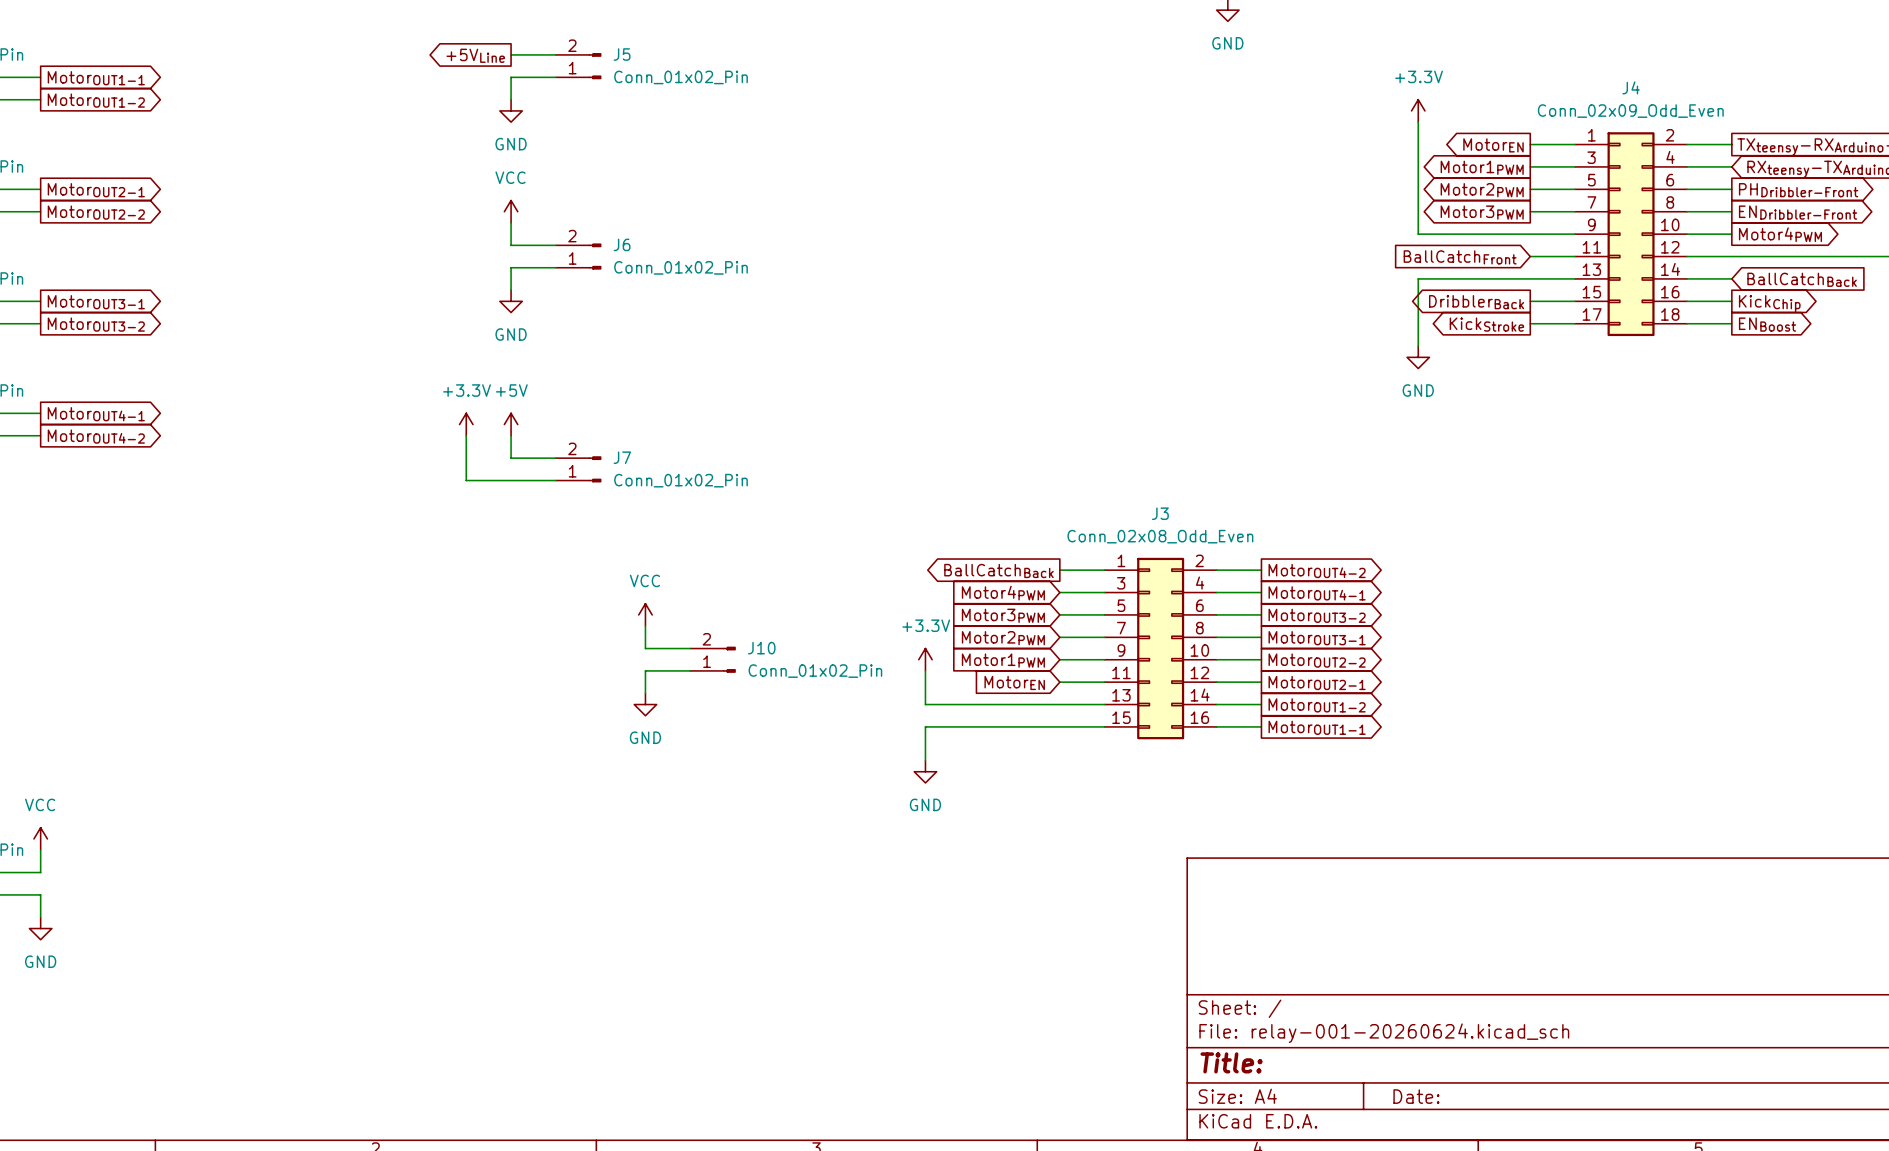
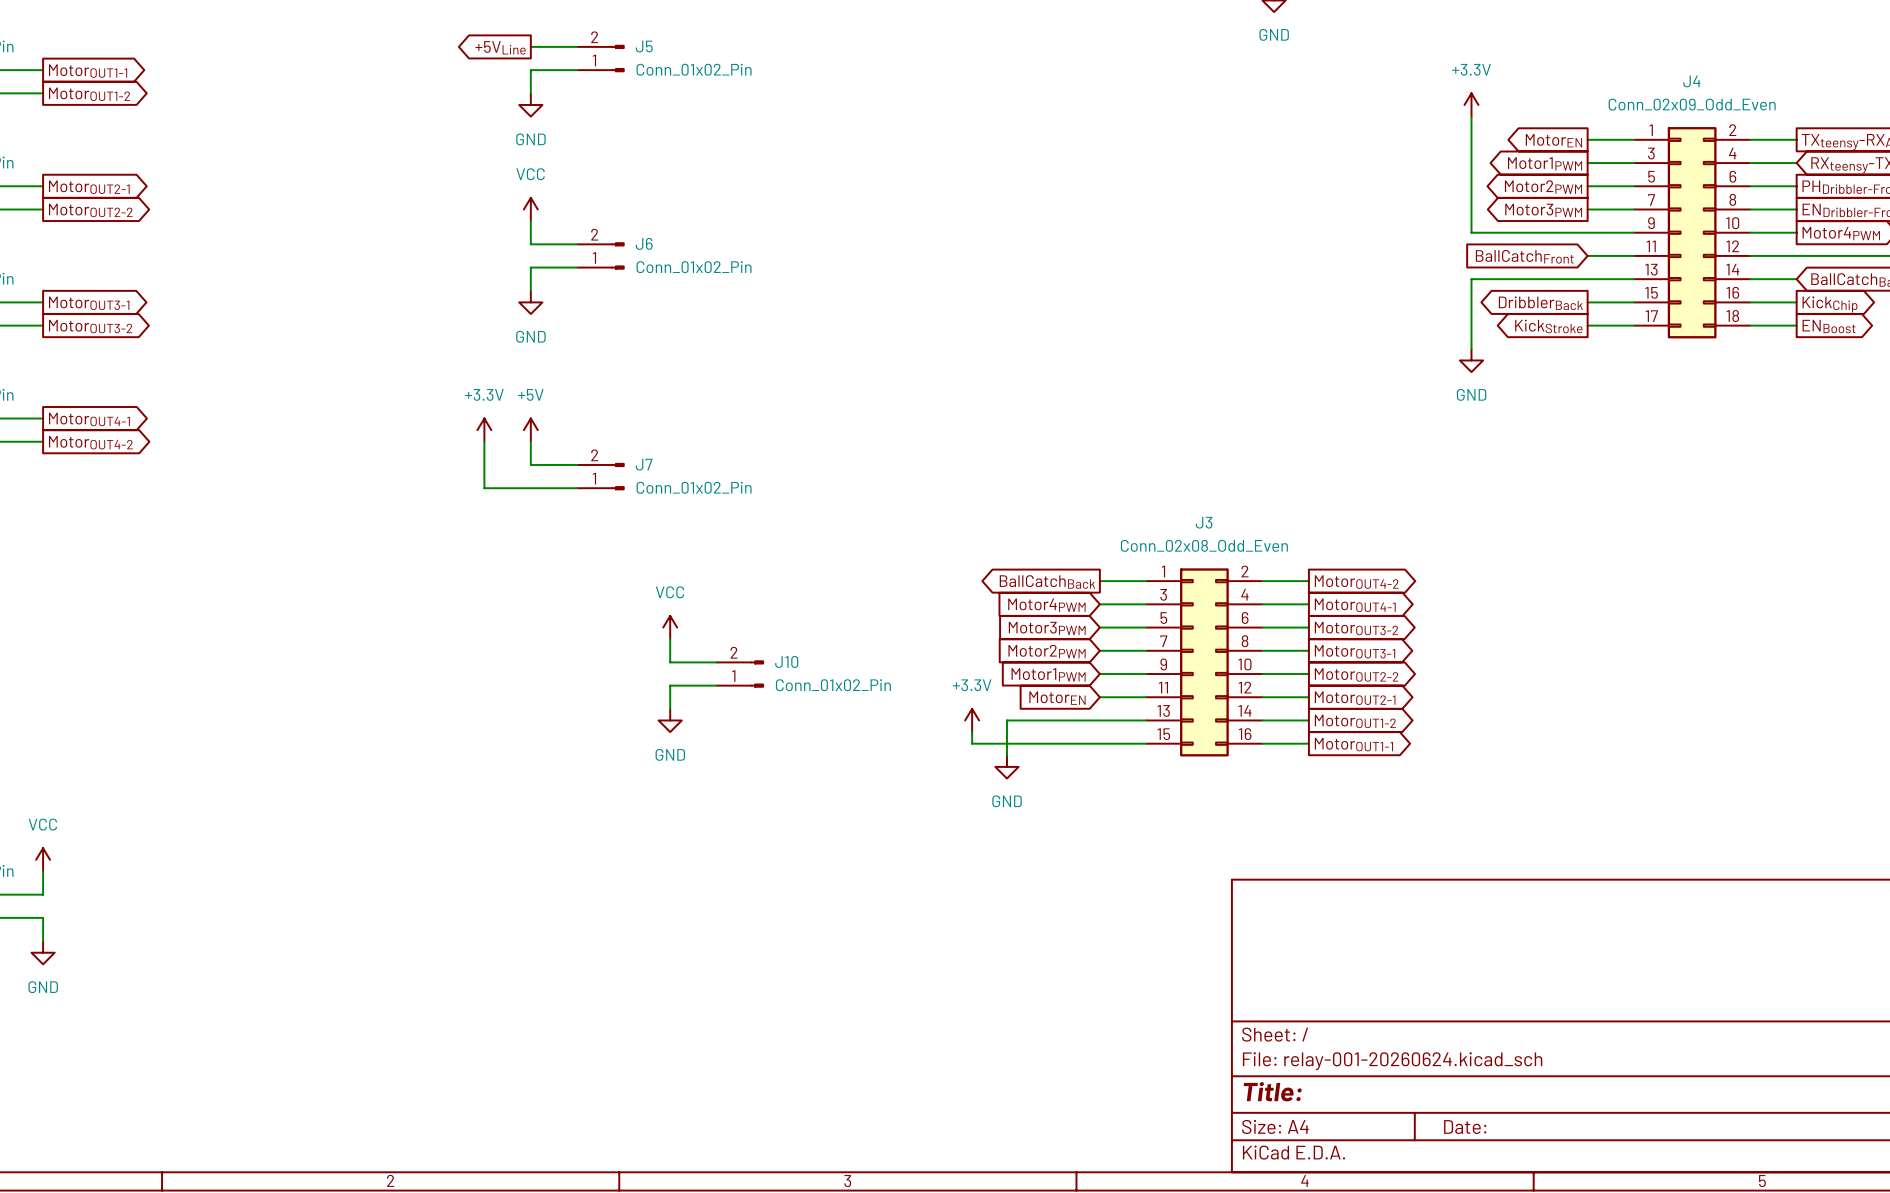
power symbol position: +3.3V (925, 659) -> +3.3V (972, 720)
wire: (925, 670) (925, 704) (970, 704) -> (1006, 755) (1006, 720)
wire: (936, 726) (925, 726) (925, 760) -> (972, 743) (972, 732)
power symbol position: GND (925, 771) -> GND (1006, 766)

